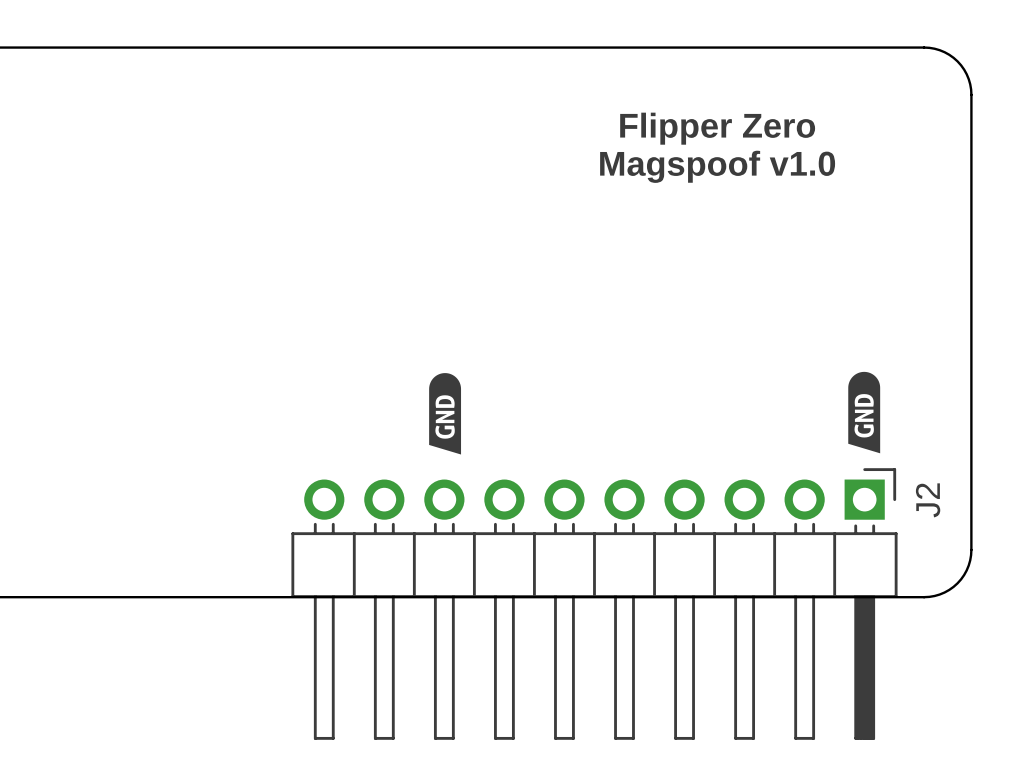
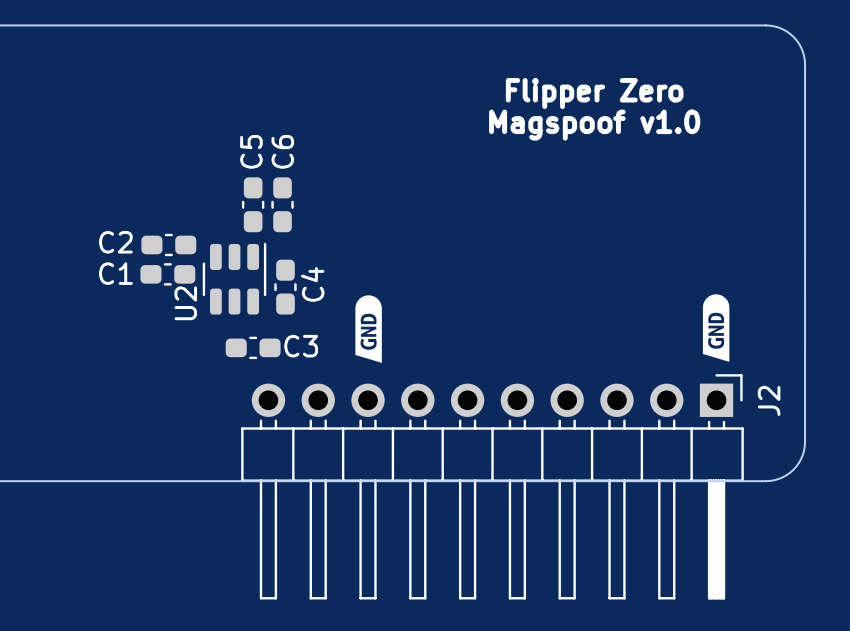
C5: none -> (253, 204)
C6: none -> (282, 204)
C2: none -> (168, 244)
C1: none -> (167, 274)
U2: none -> (234, 278)
C4: none -> (285, 287)
C3: none -> (253, 347)

